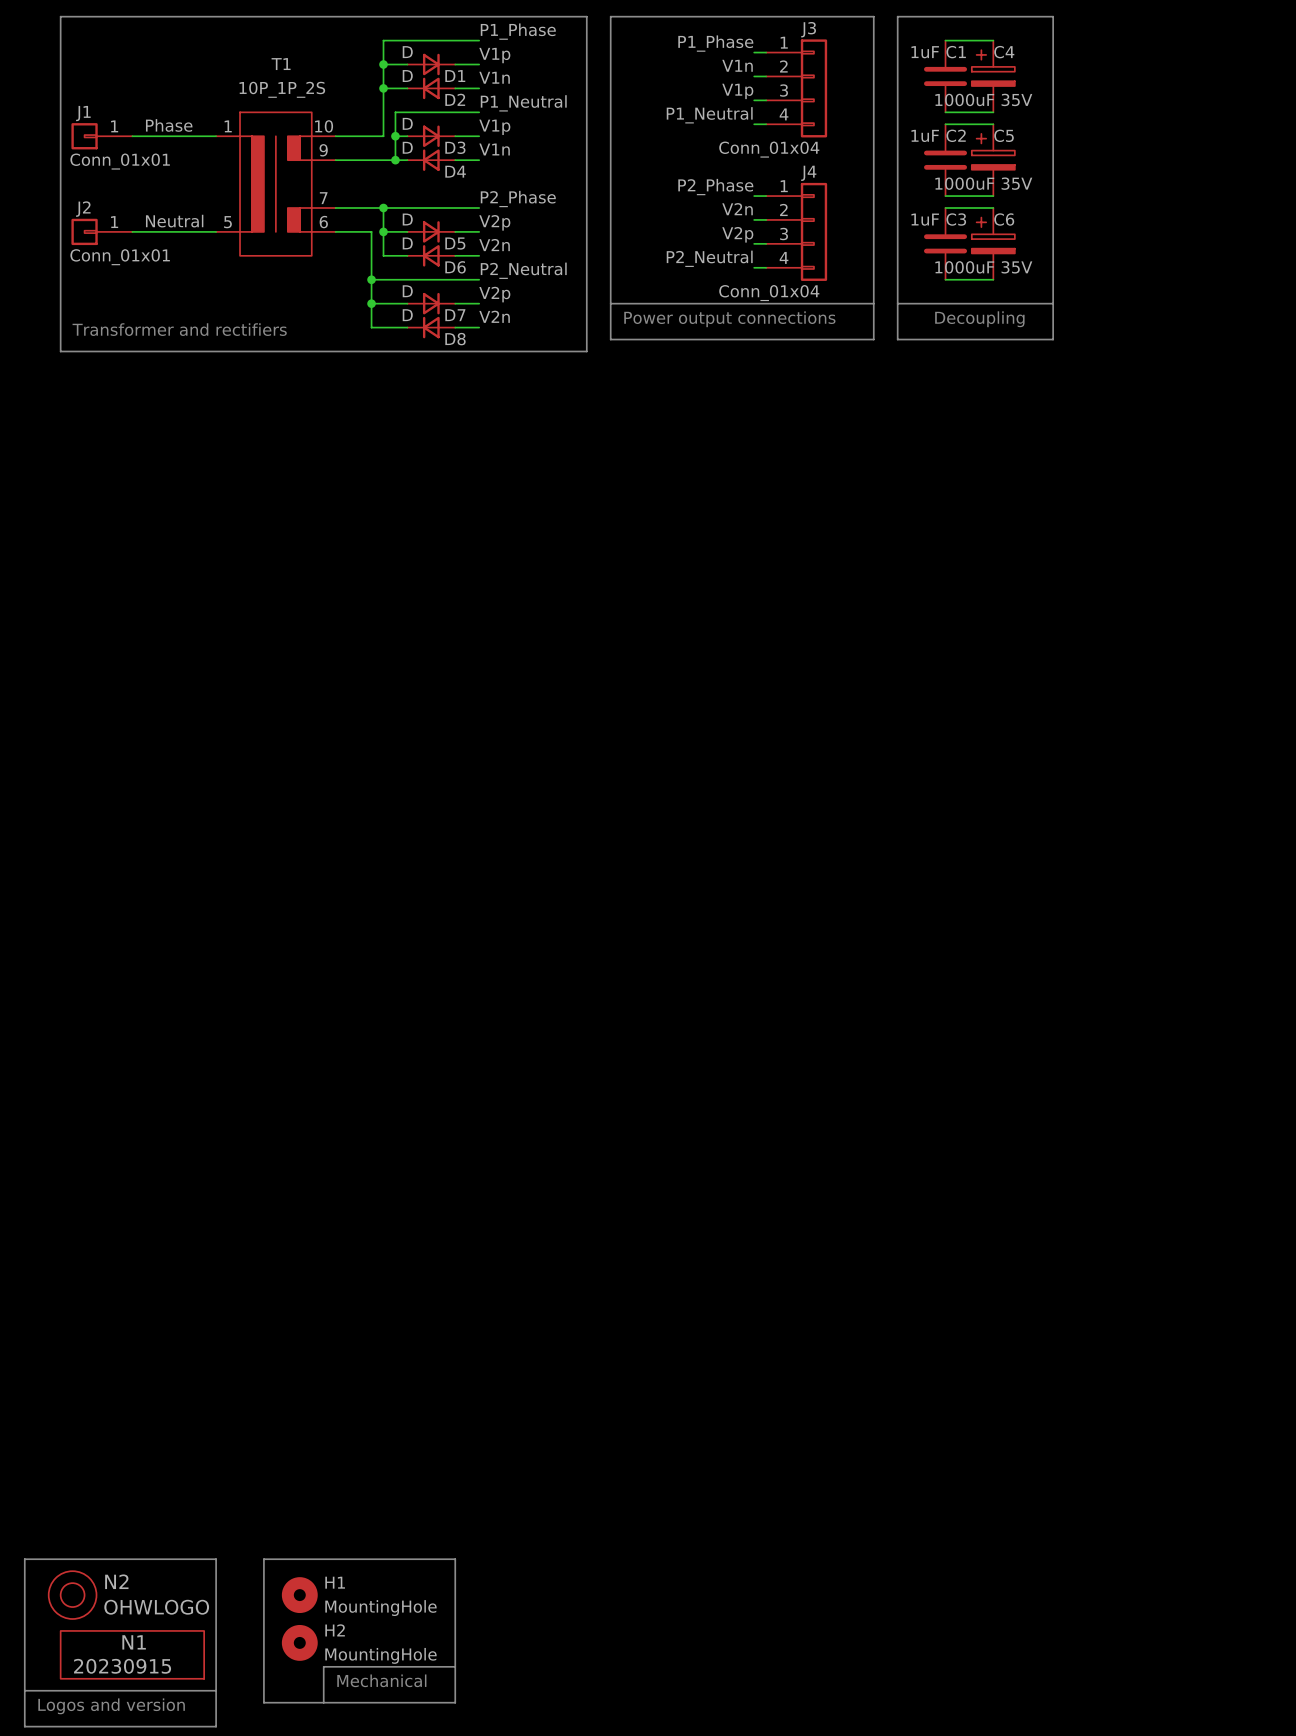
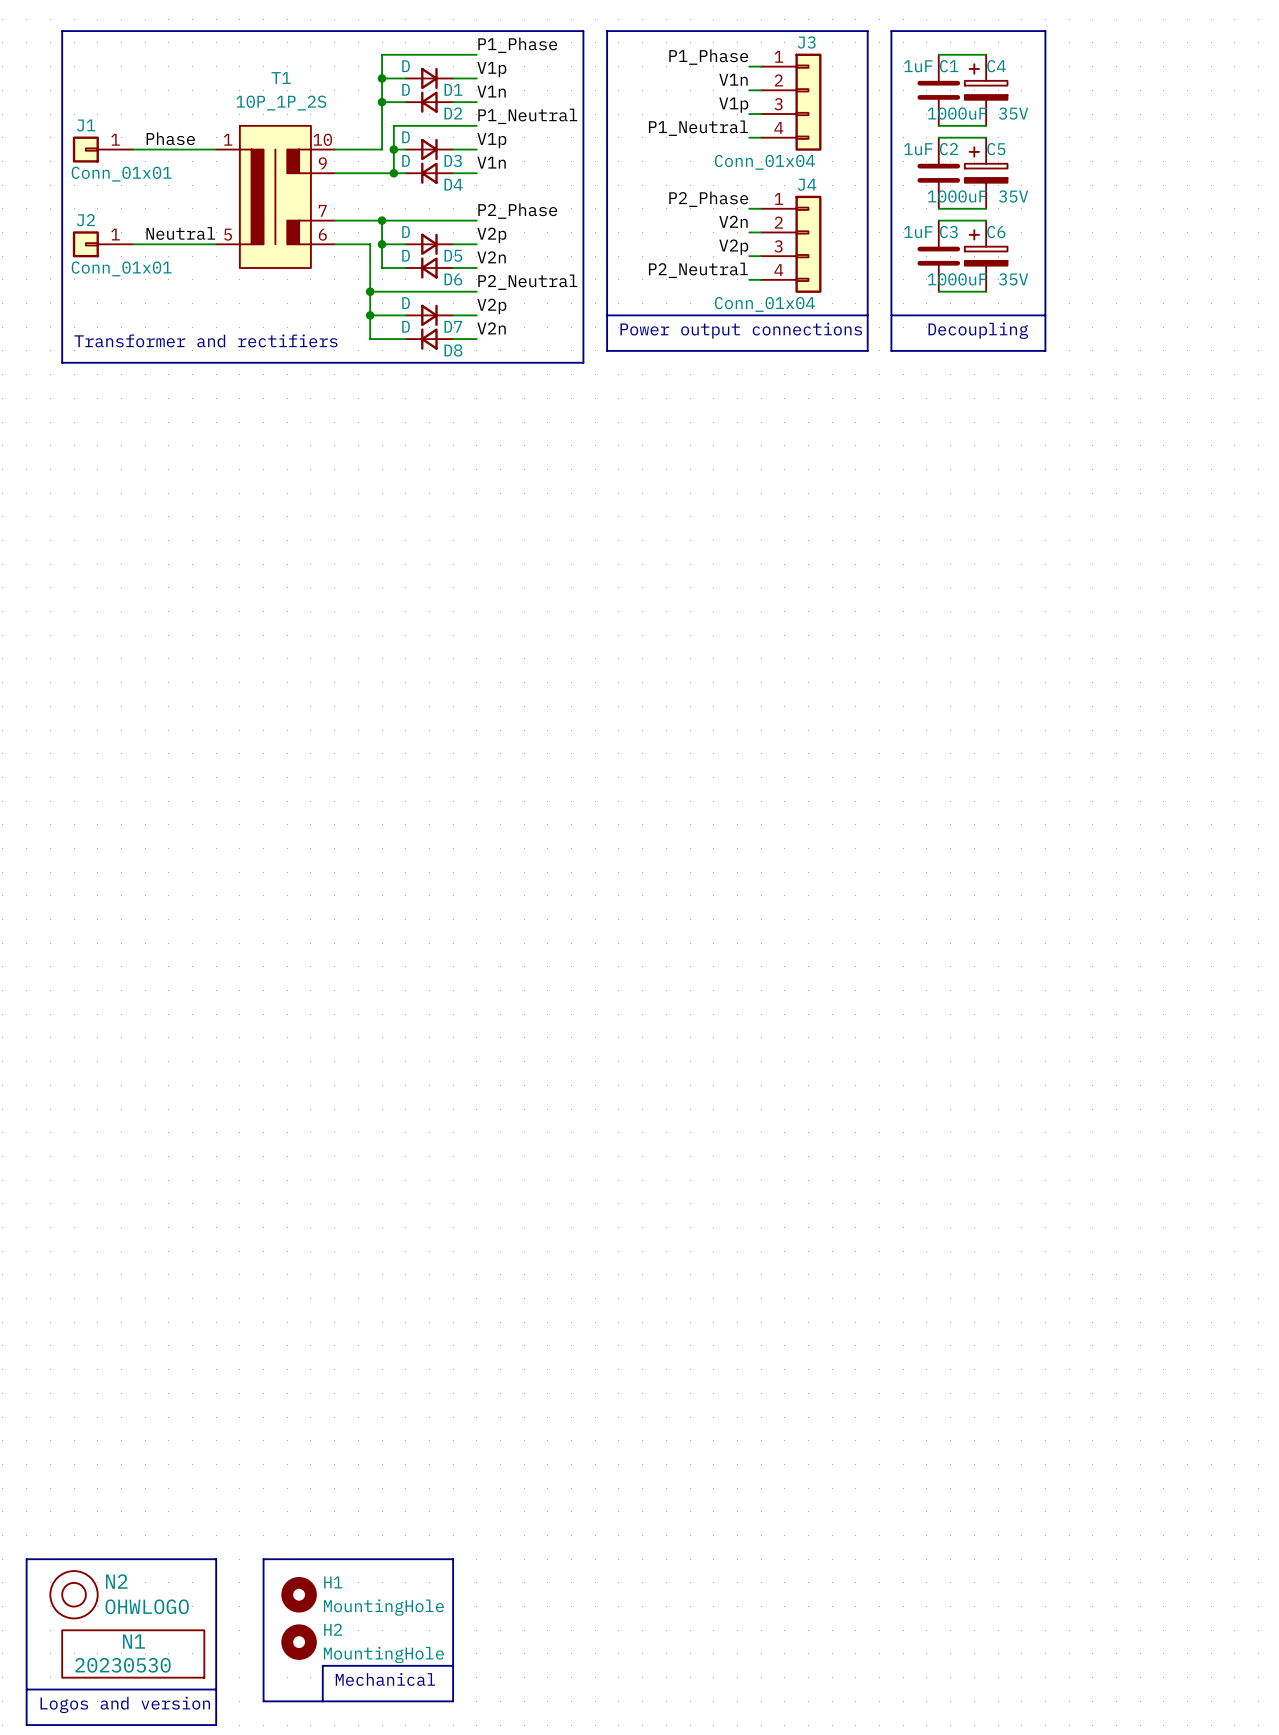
N1 value: 20230915 (122, 1666) -> 20230530 (122, 1665)

